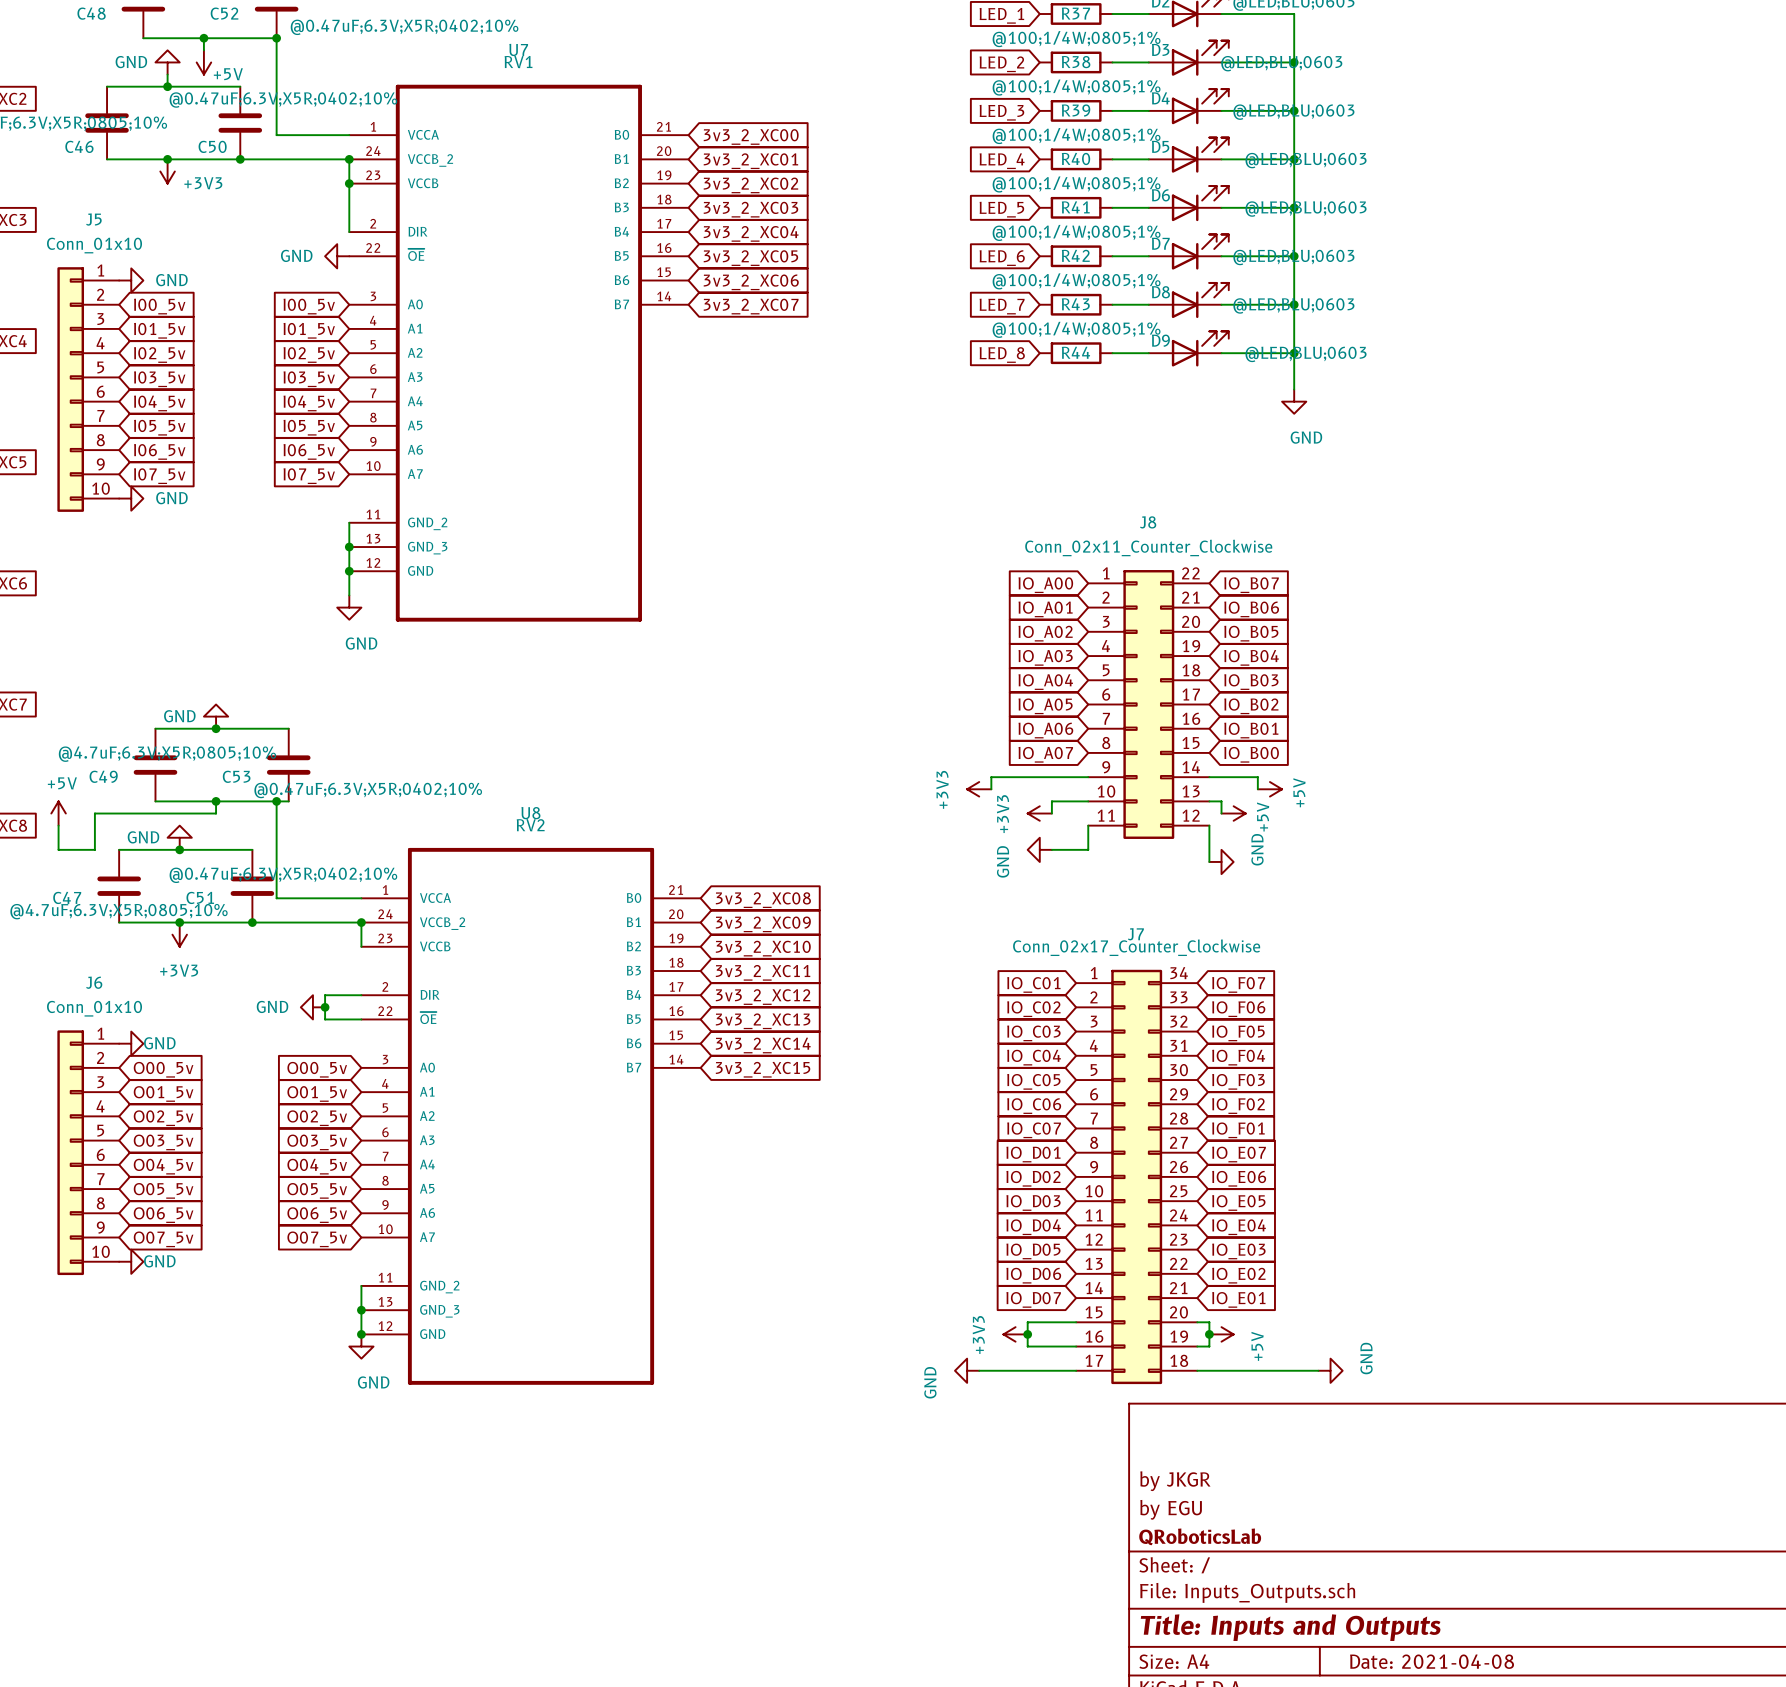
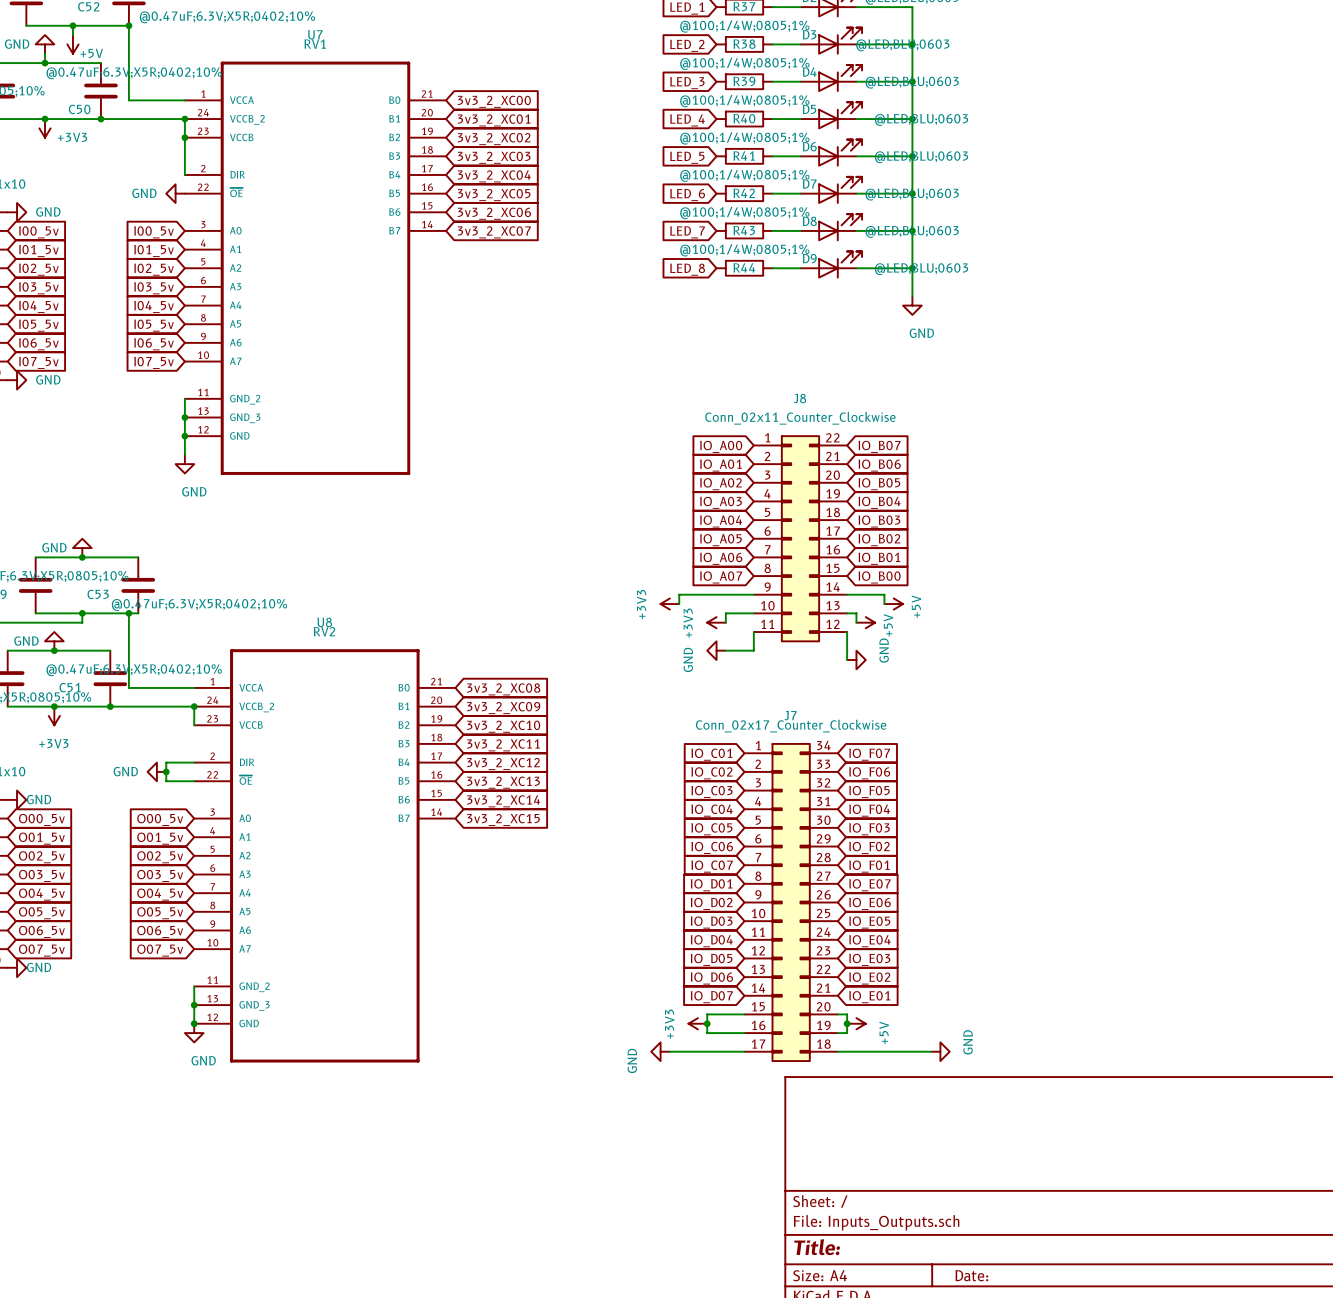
title block: by JKGR (1175, 1481) -> none
title block: by EGU (1171, 1509) -> none
title block: QRoboticsLab (1200, 1536) -> none
title block: Title: Inputs and Outputs (1290, 1627) -> Title: (817, 1247)
title block: Date: 2021-04-08 (1432, 1661) -> Date: (971, 1275)

